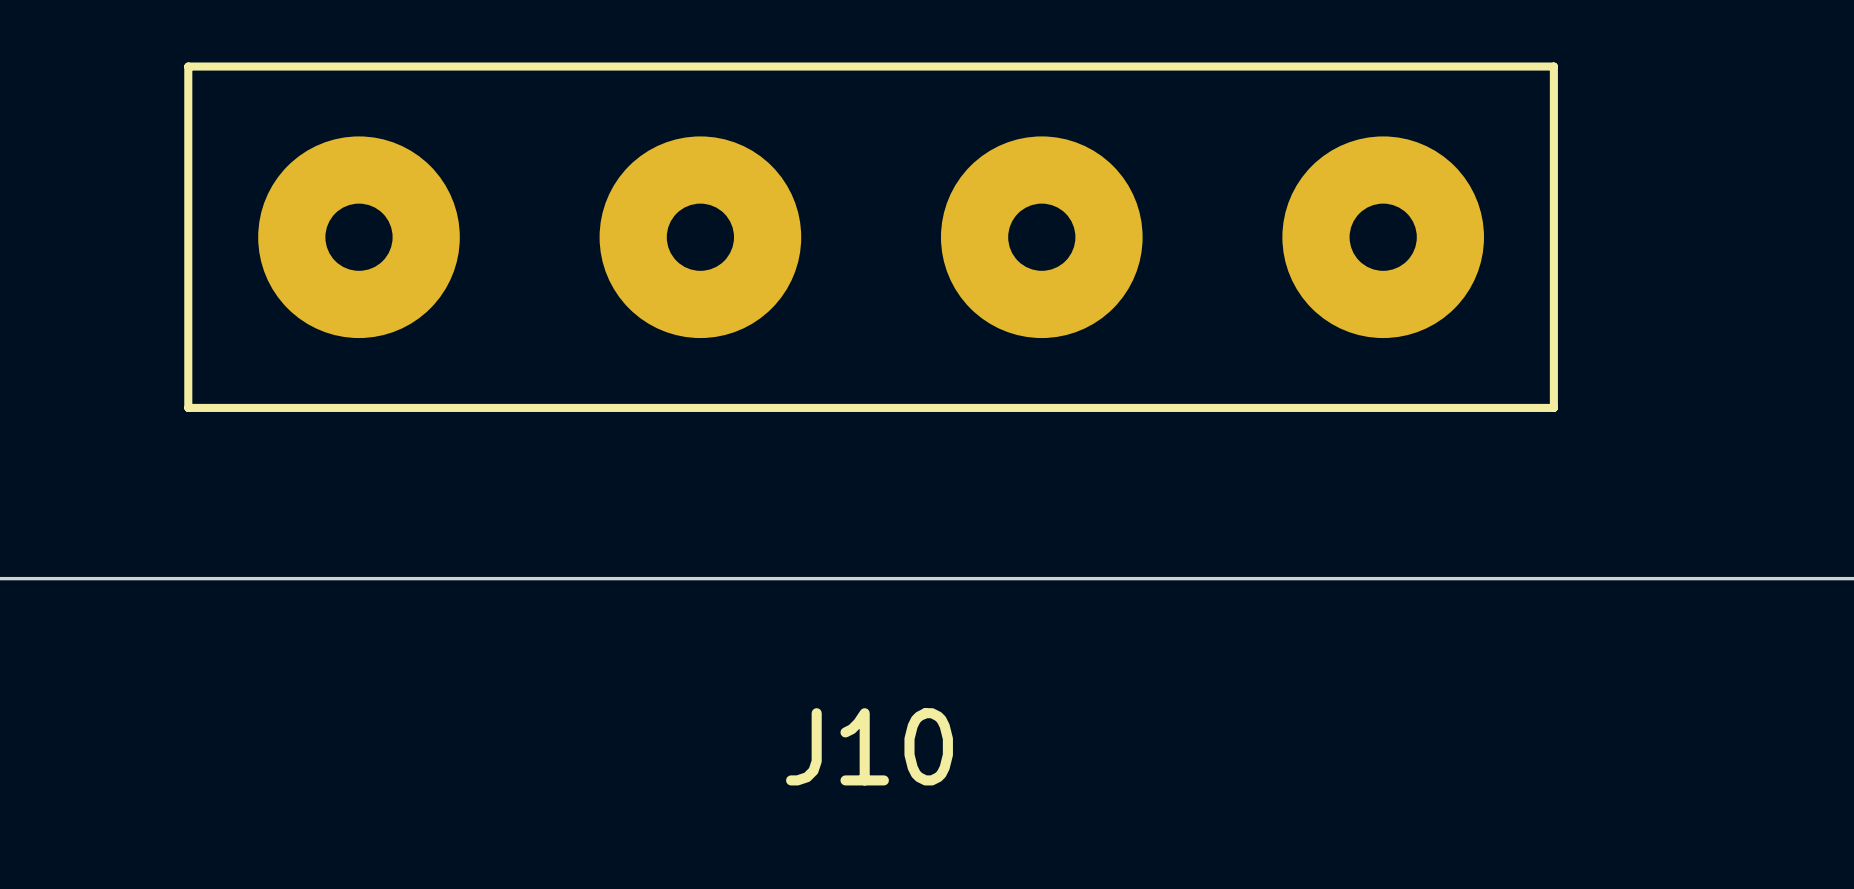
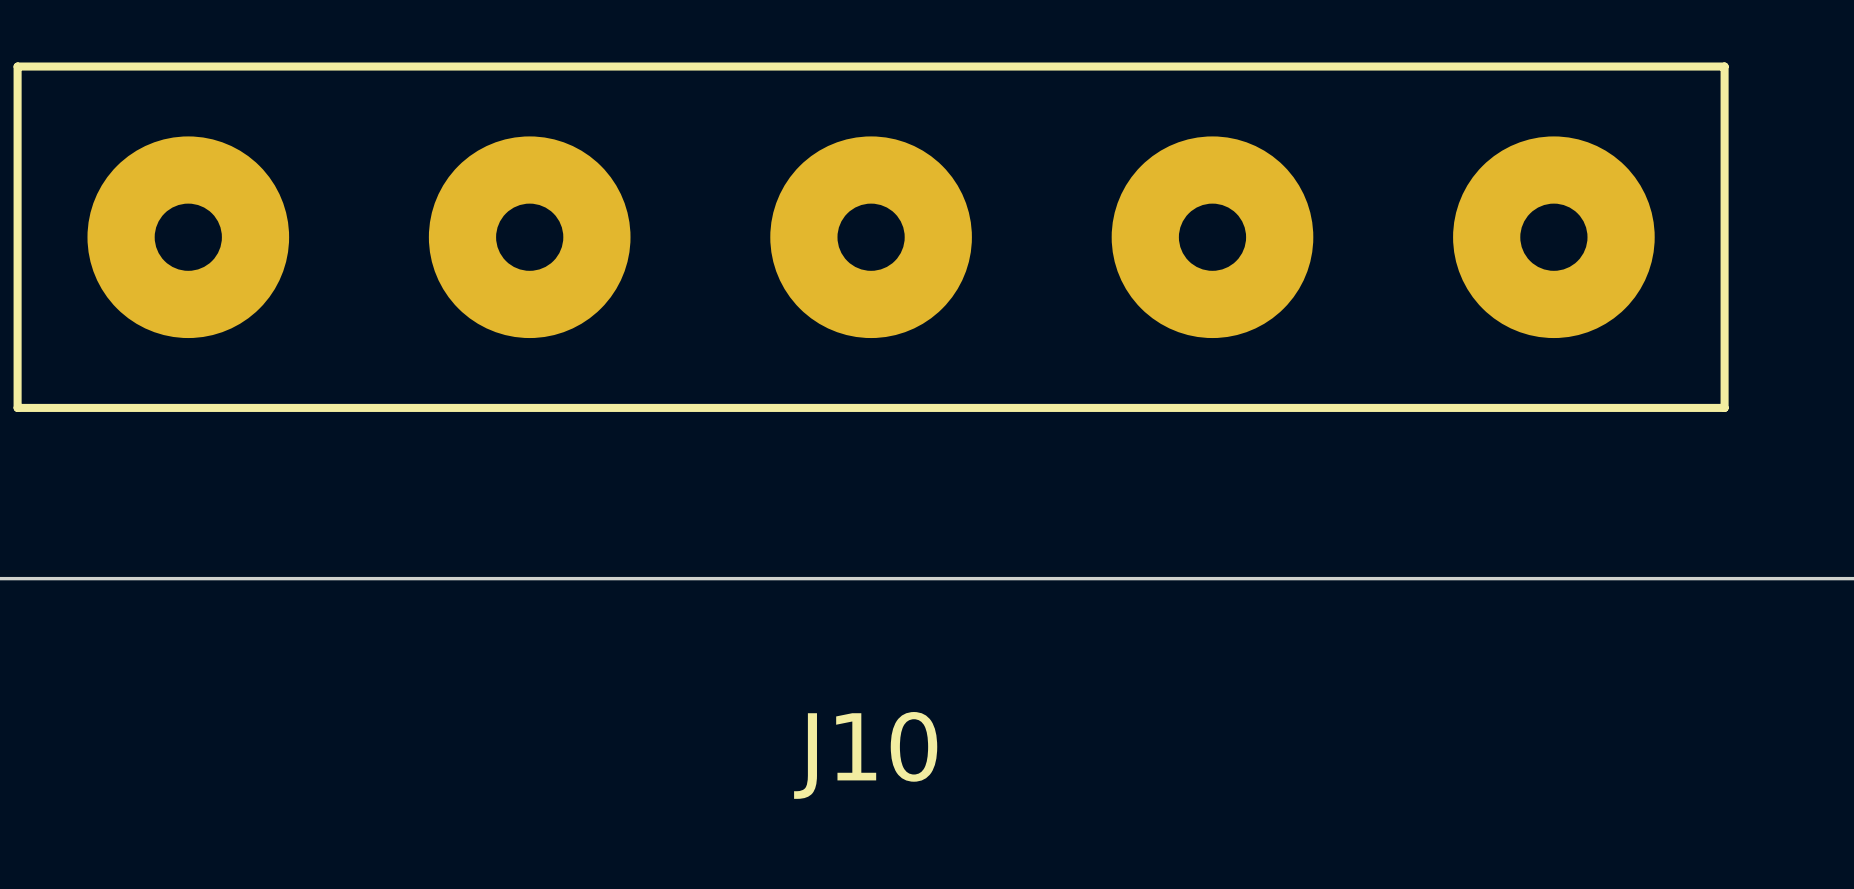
J10 footprint: [184, 62, 1558, 412] -> [13, 62, 1729, 412]

